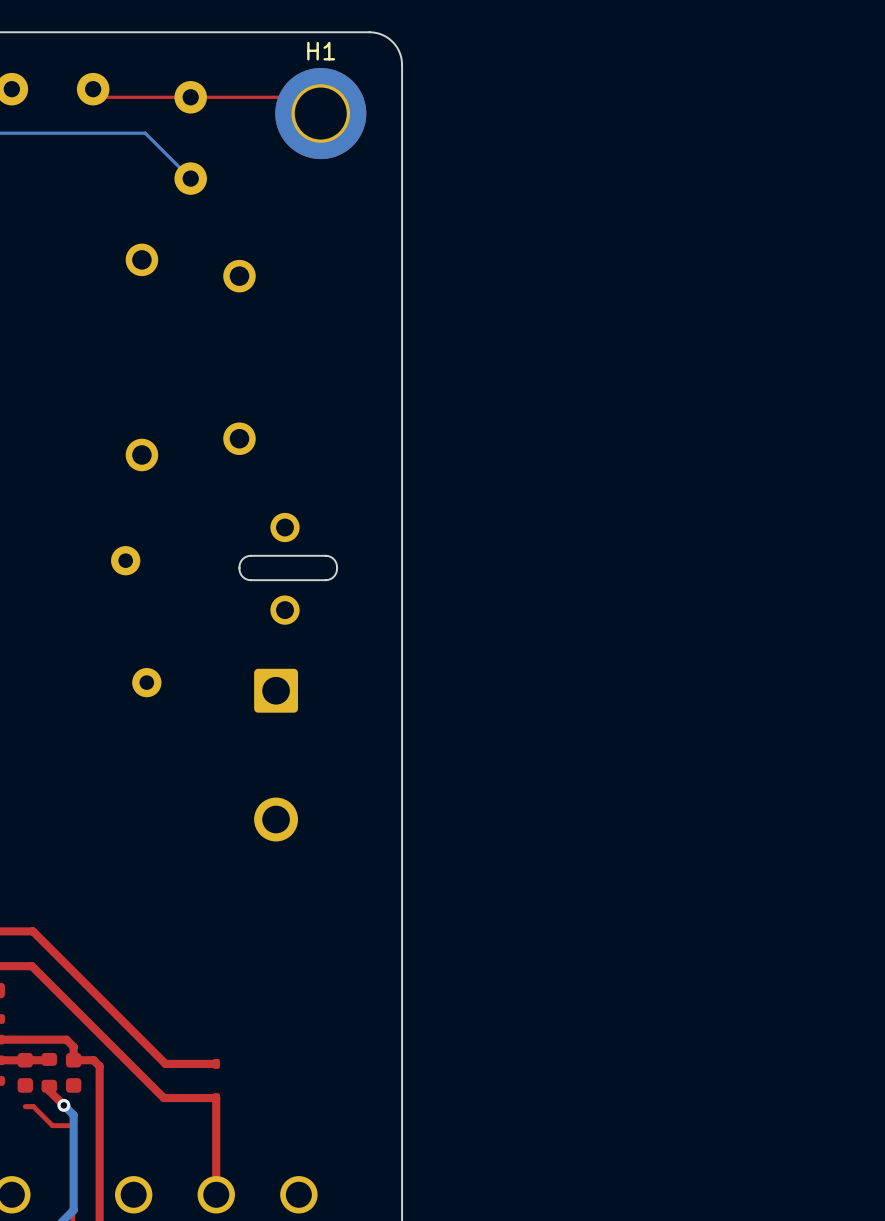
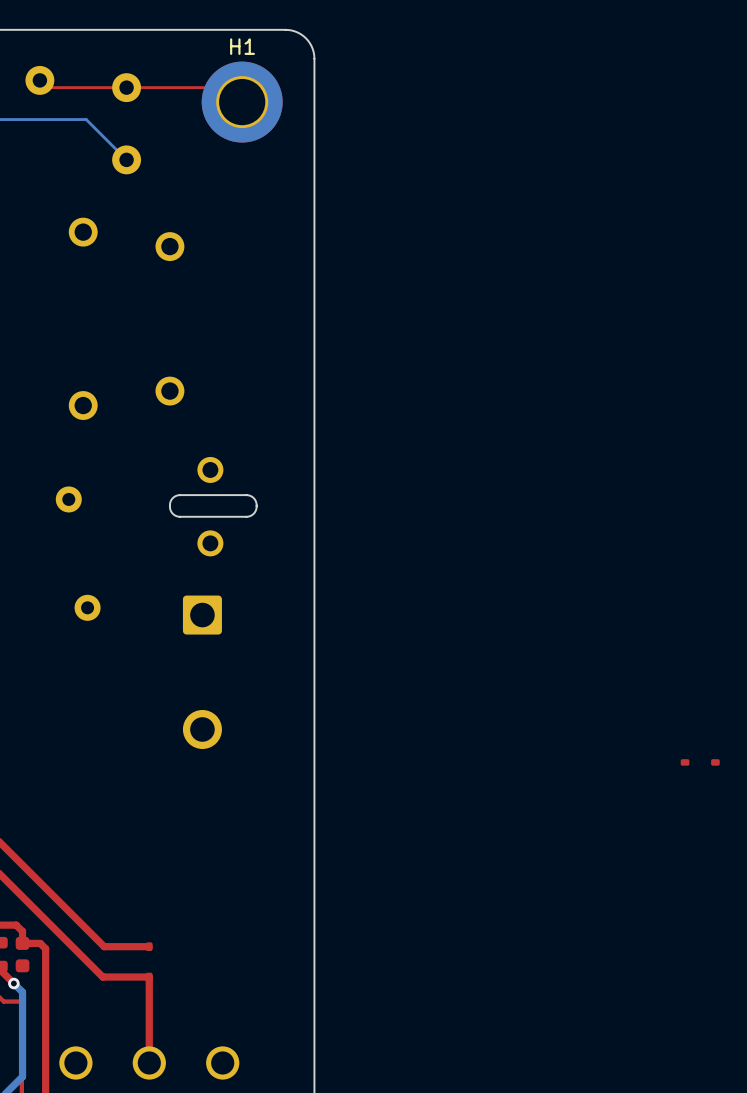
part: none -> (700, 762)

